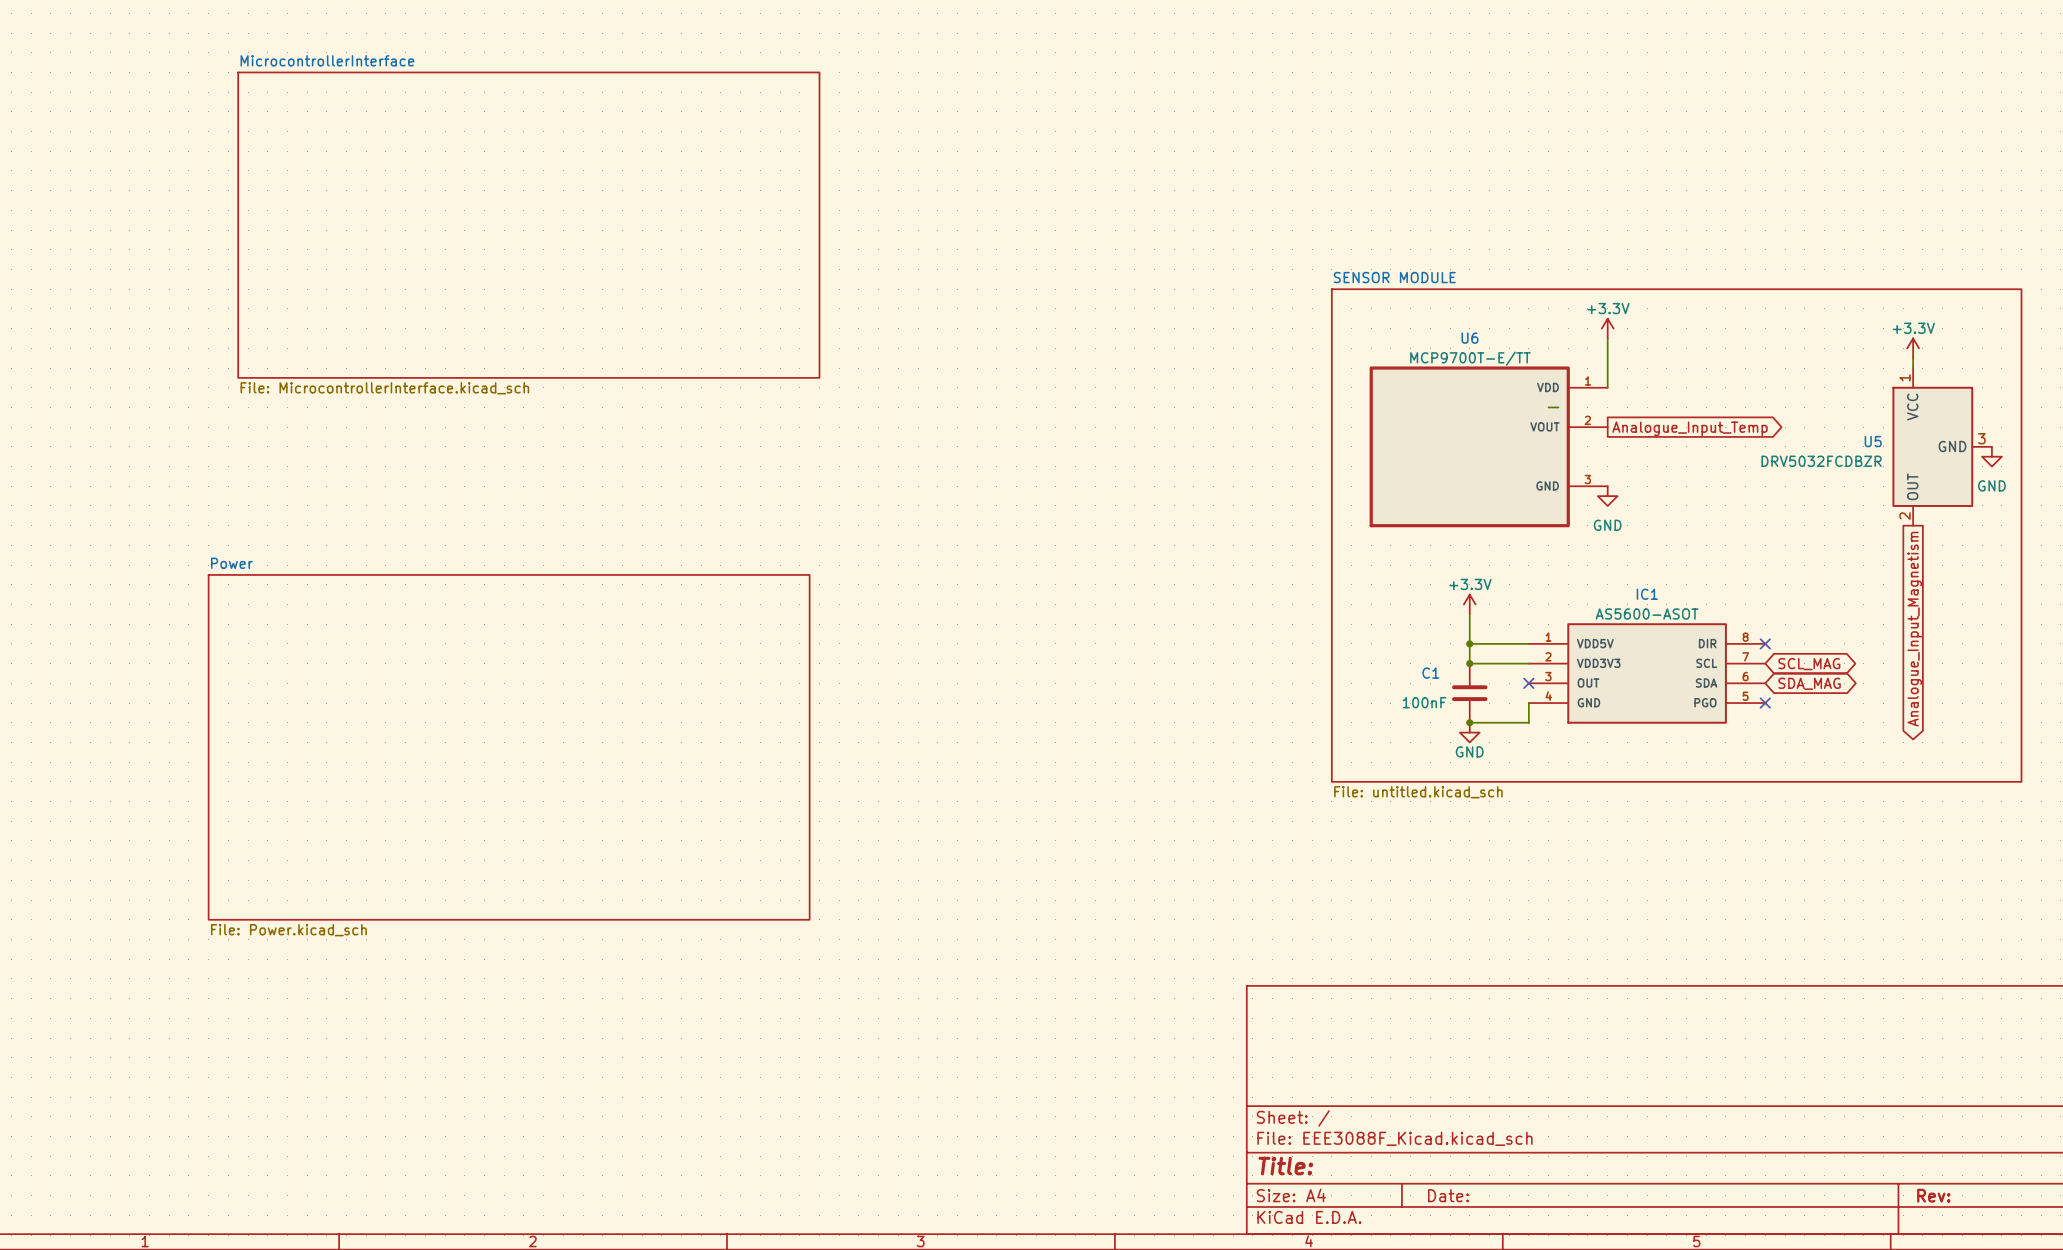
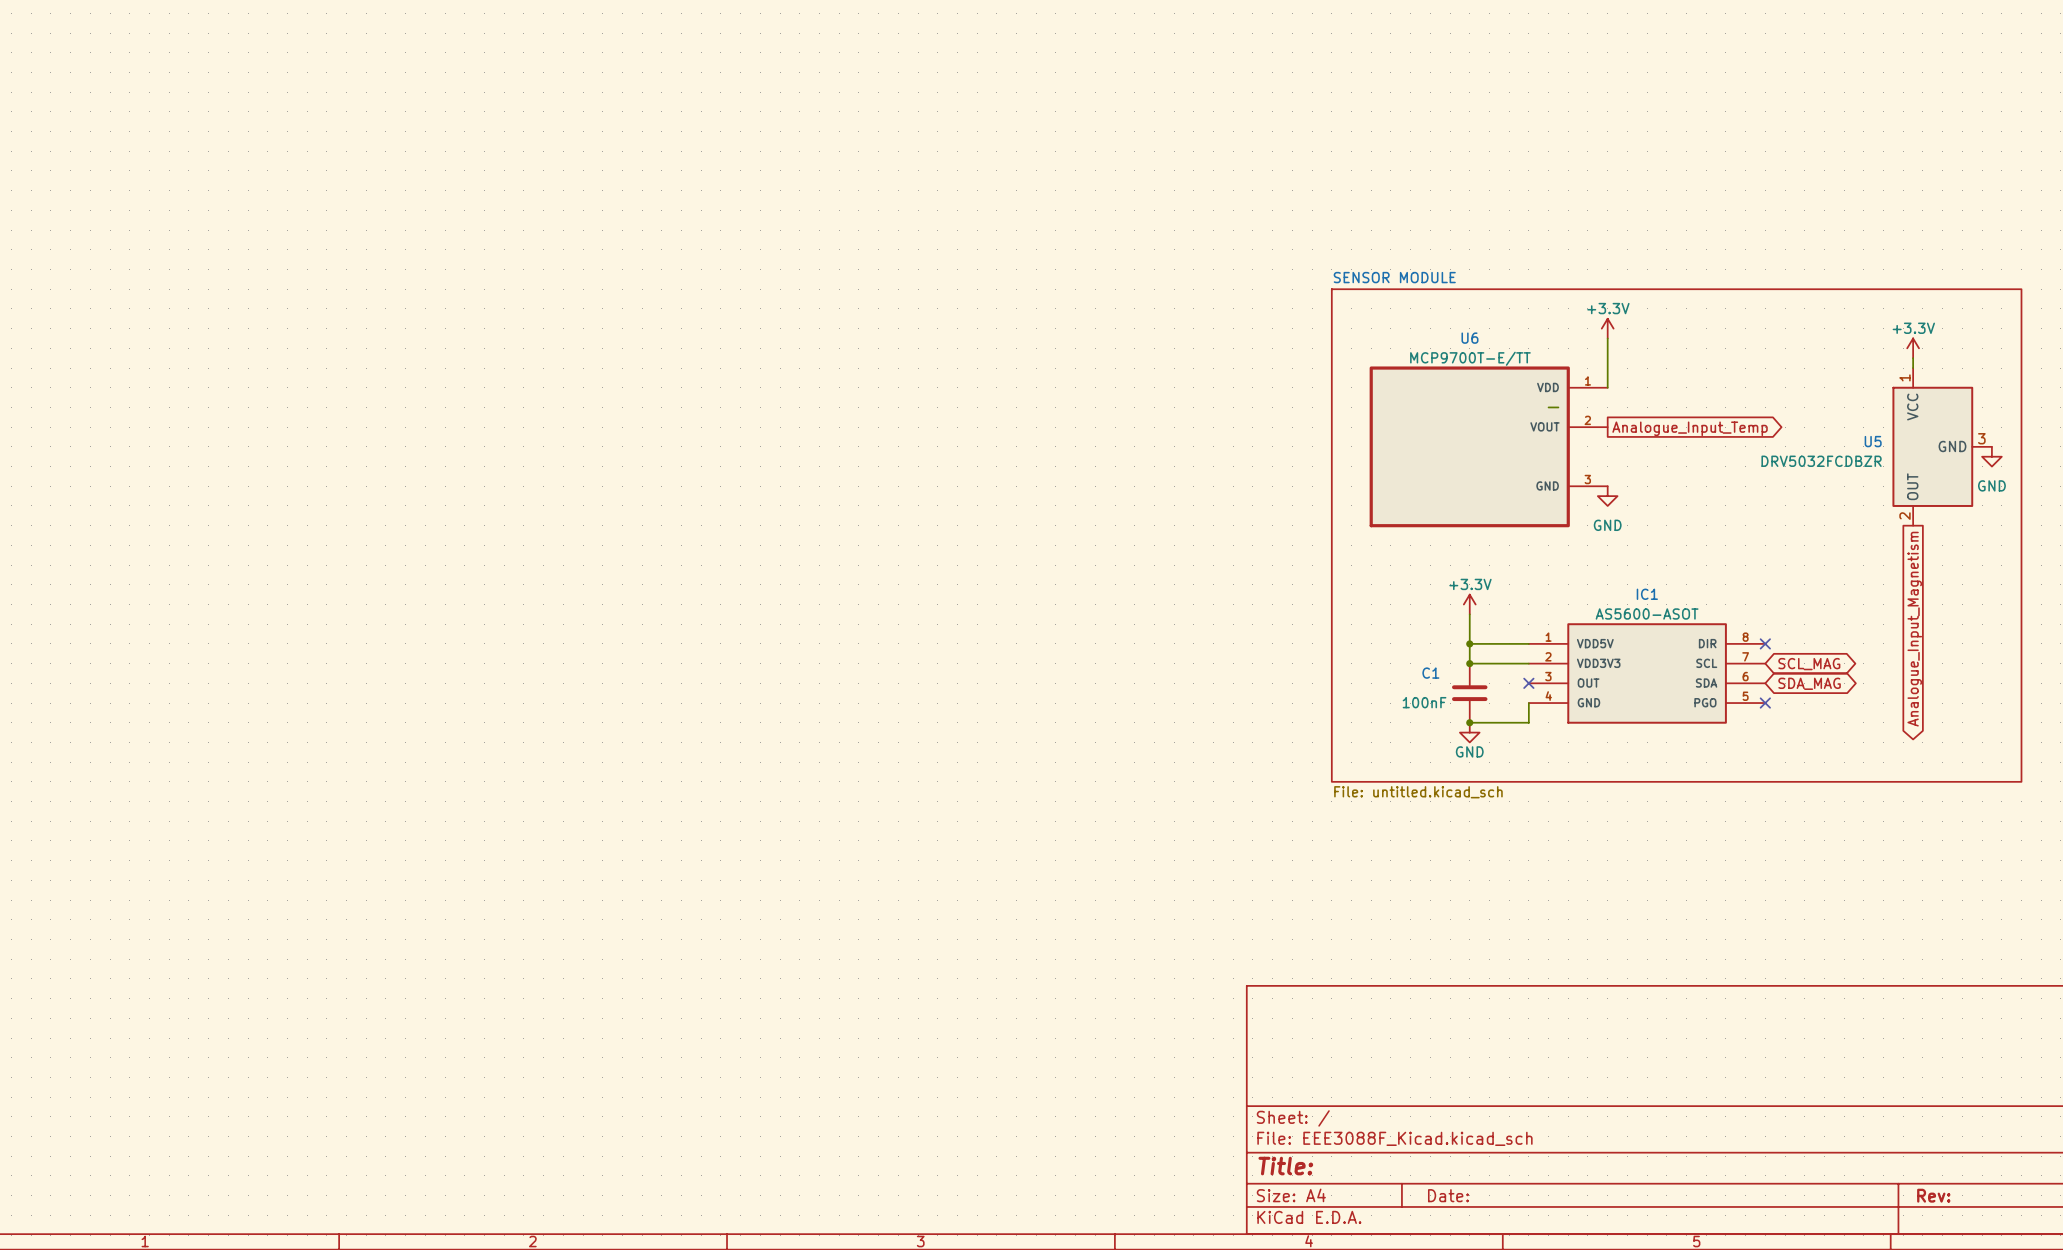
sheet MicrocontrollerInterface: File: MicrocontrollerInterface.kicad_sch (528, 225) -> none
sheet Power: File: Power.kicad_sch (509, 747) -> none

